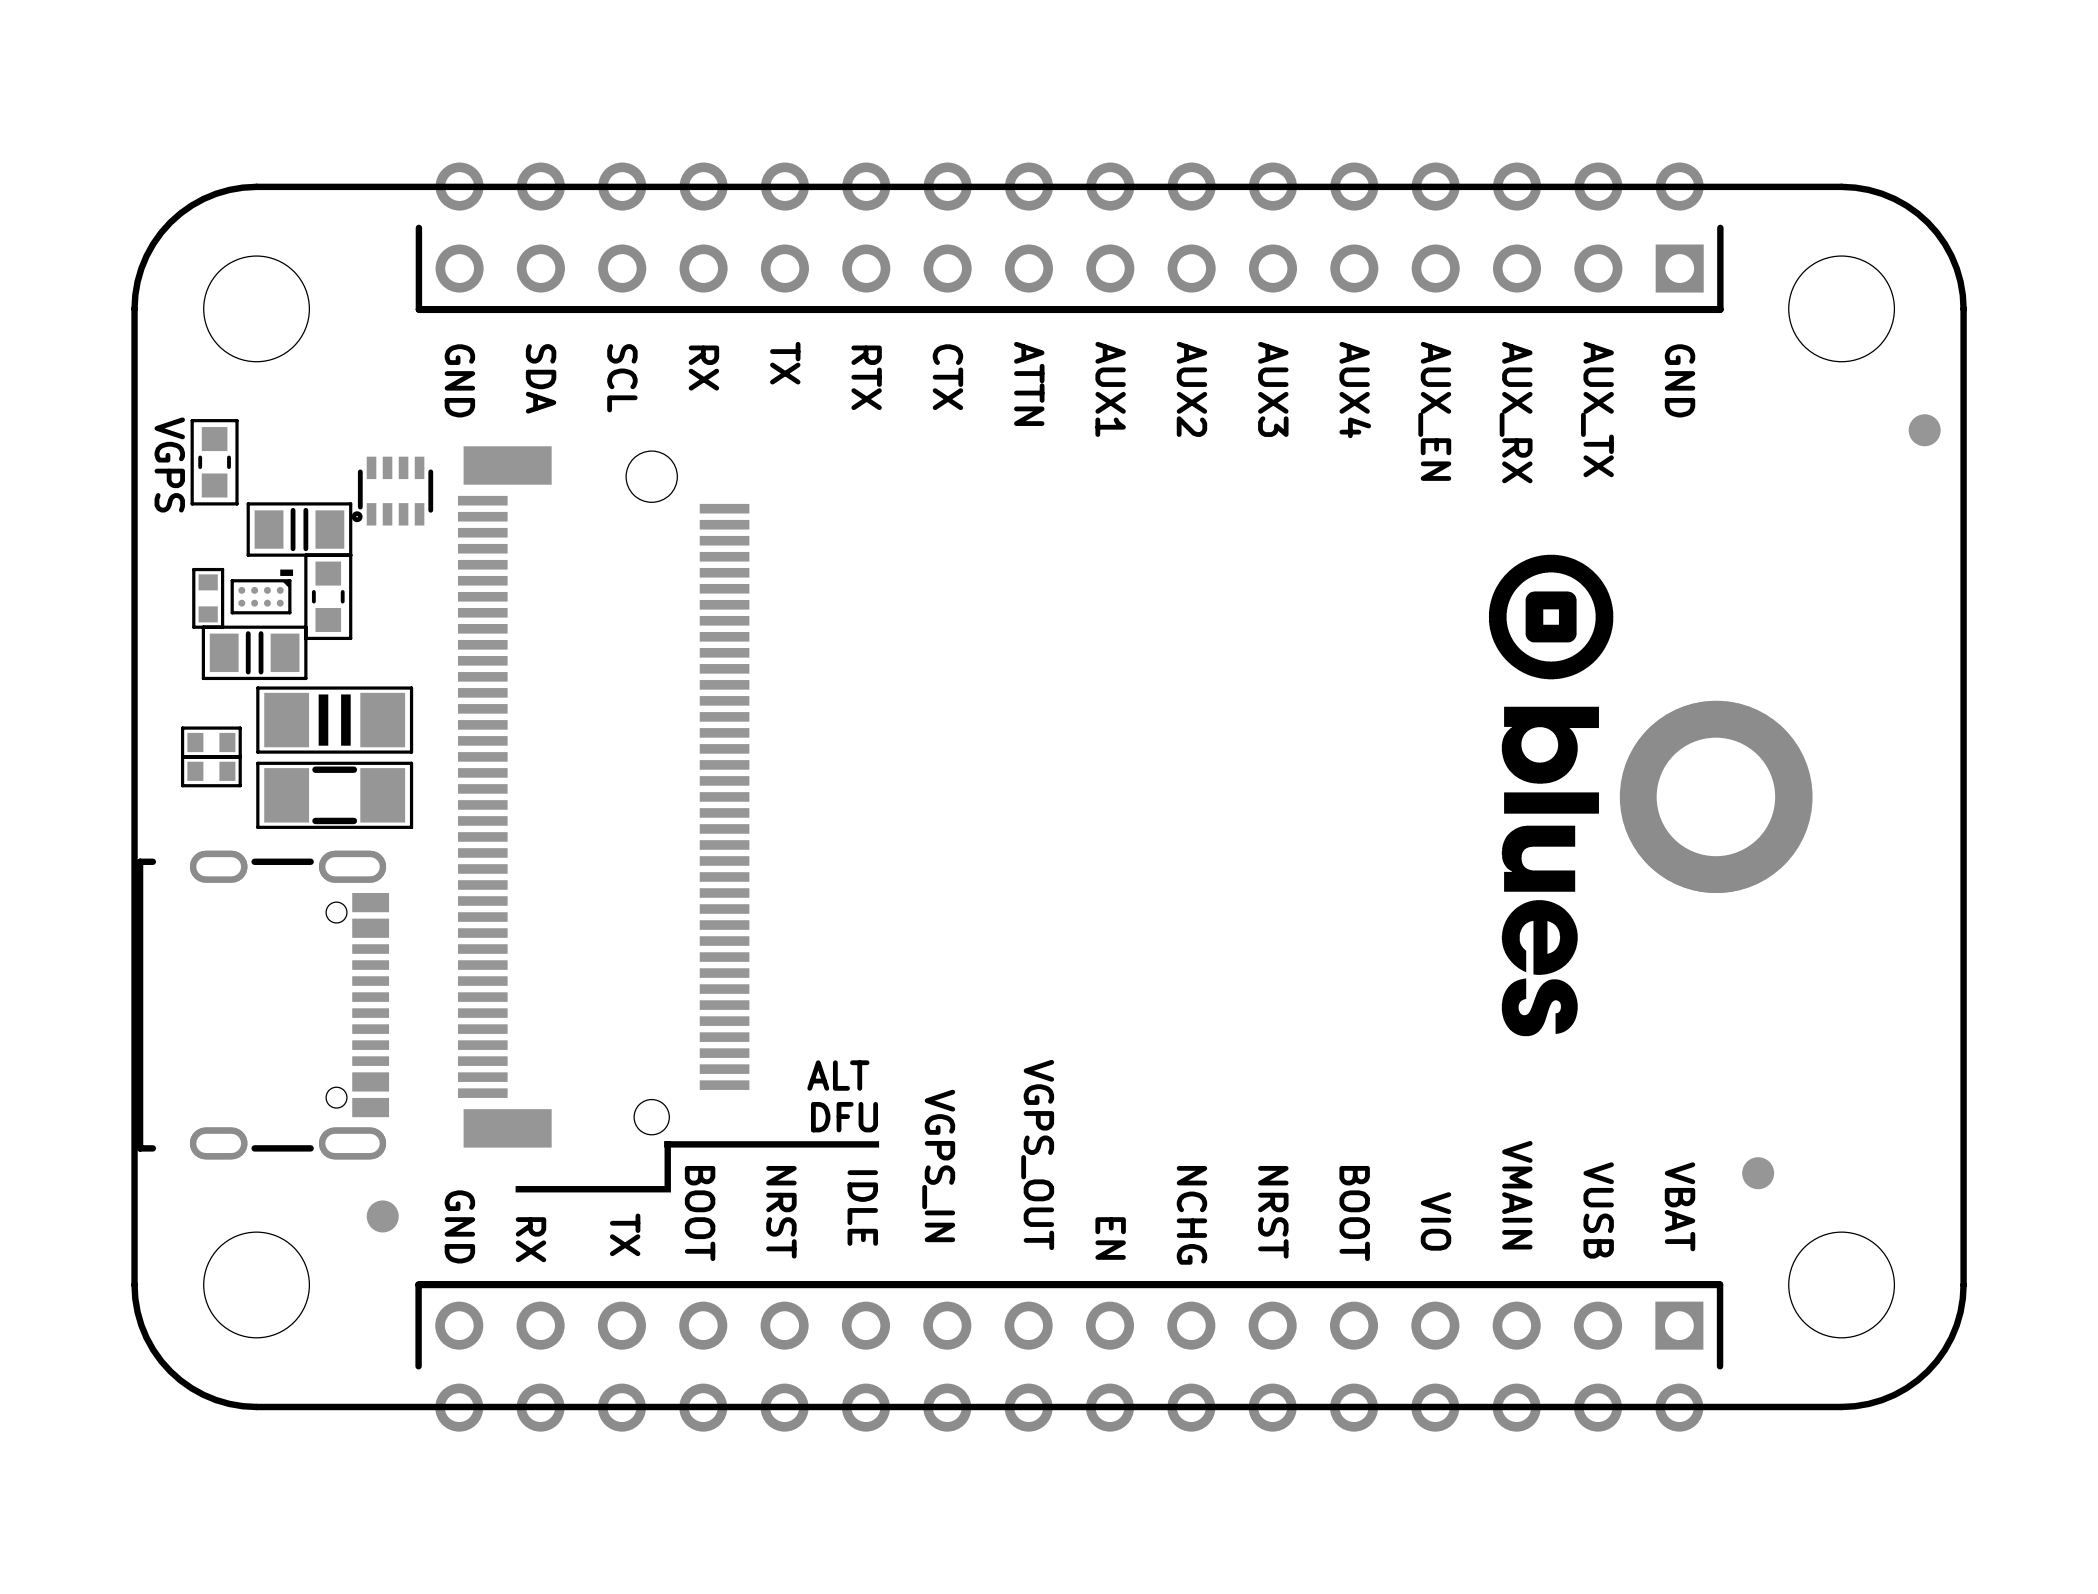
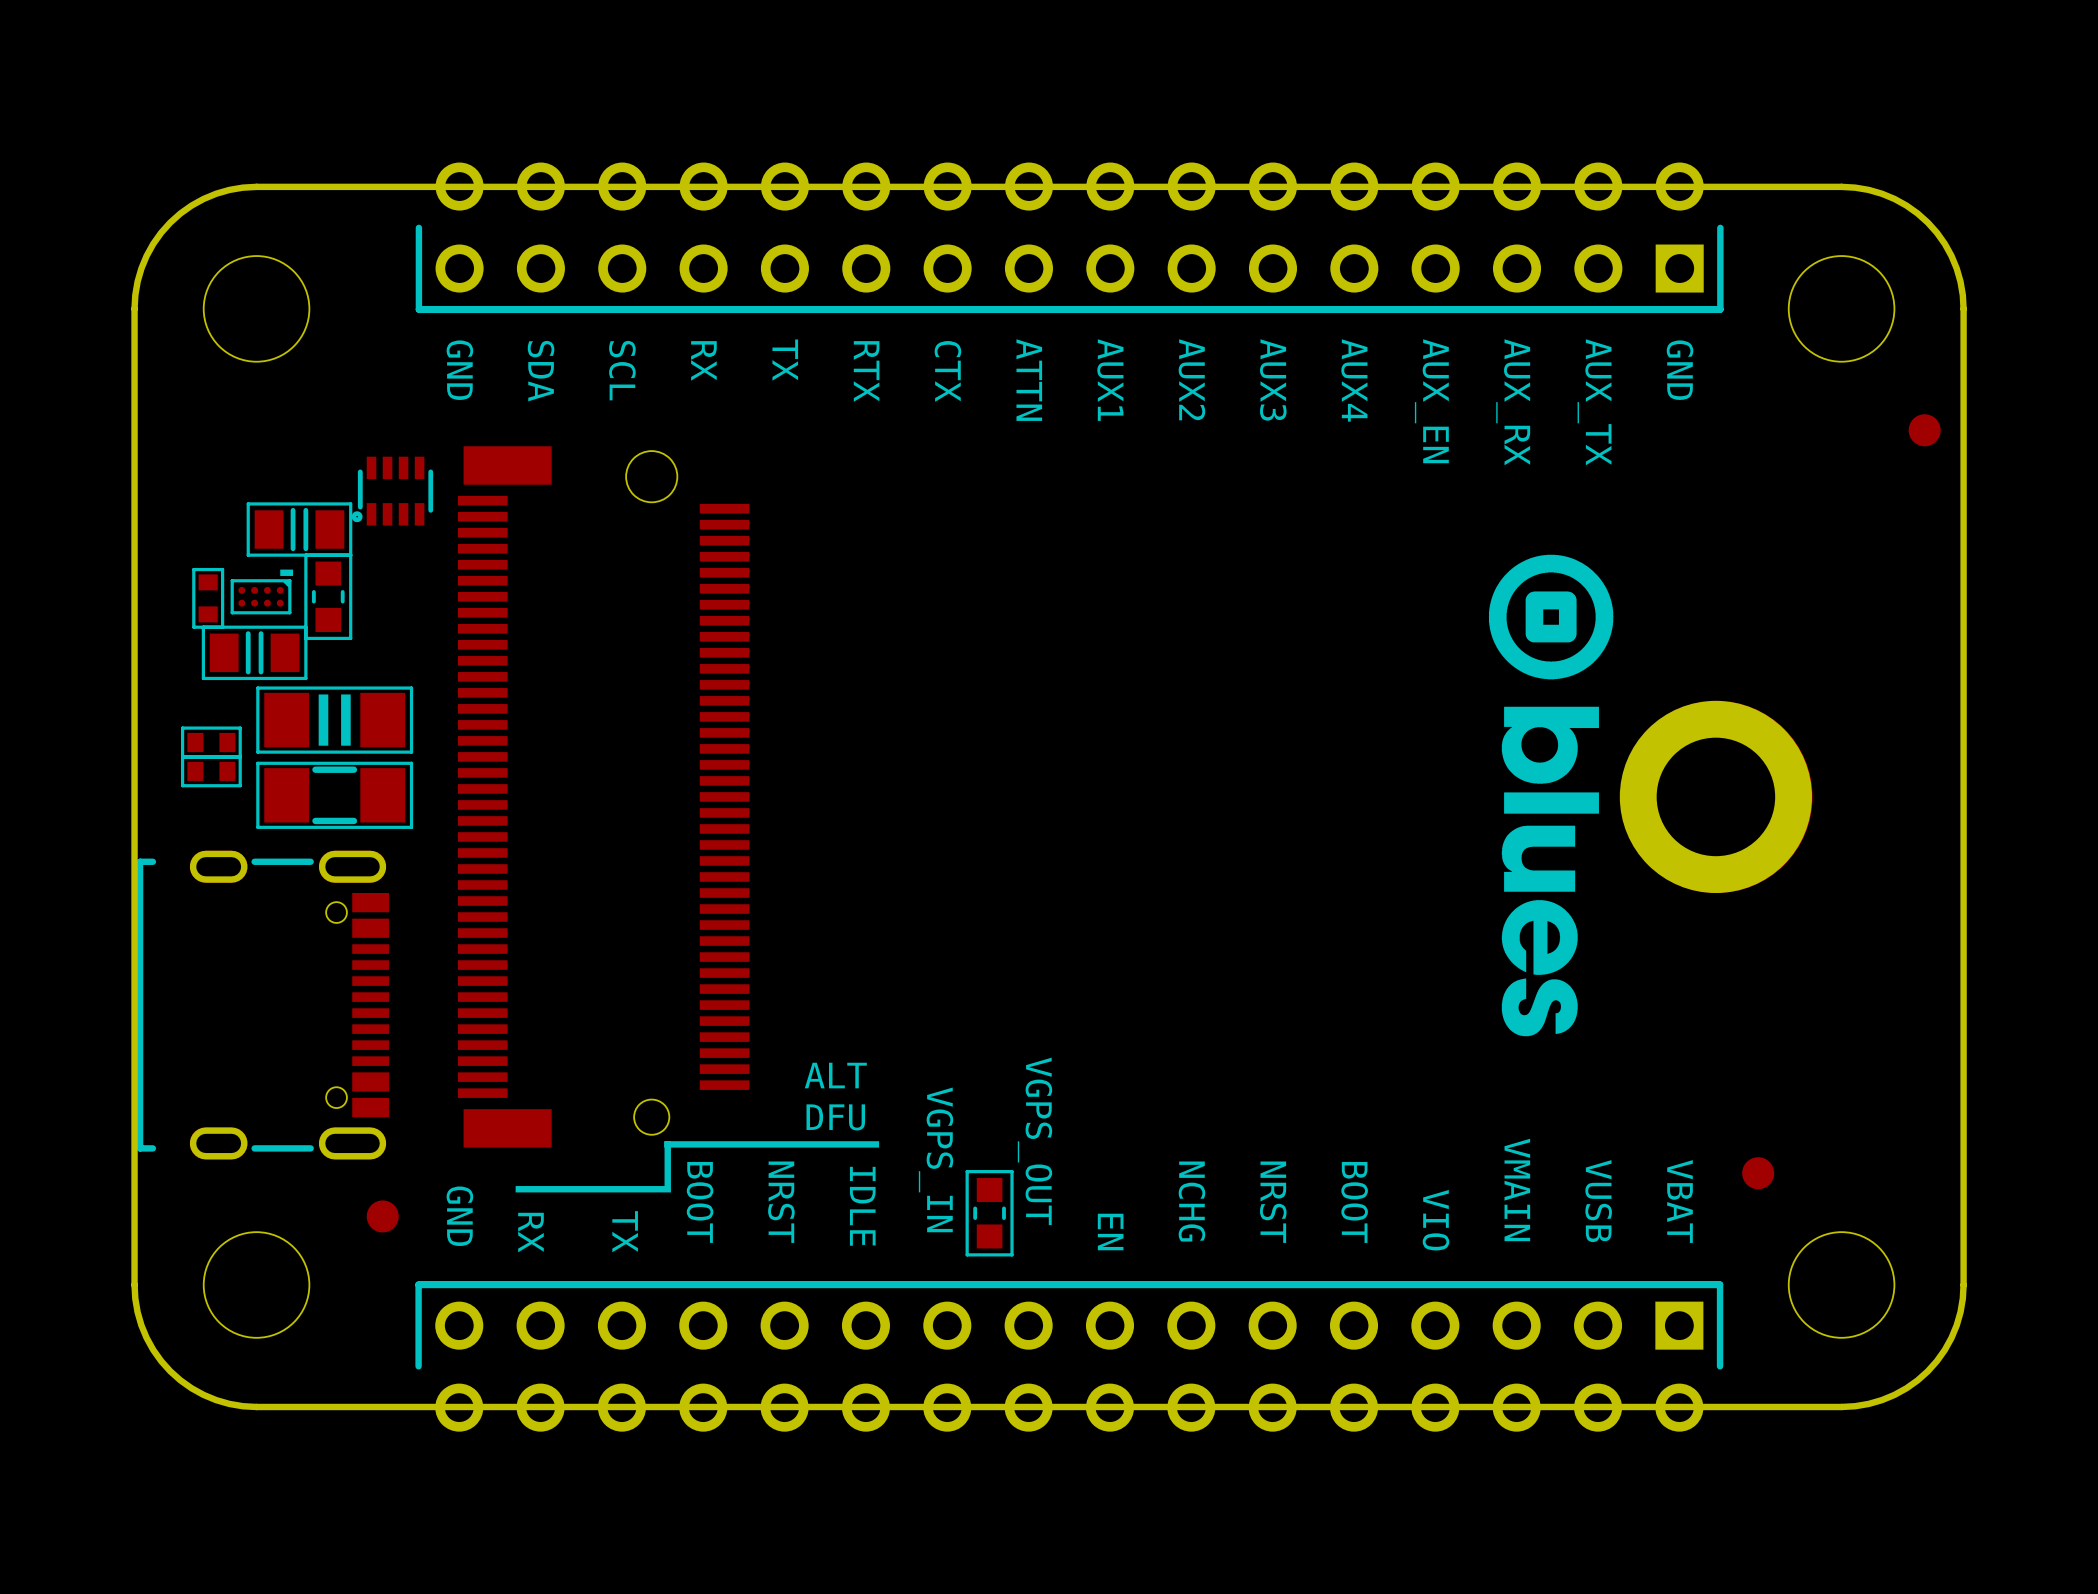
part: (214, 462) -> none
text: VGPS (169, 464) -> none
part: none -> (989, 1213)

